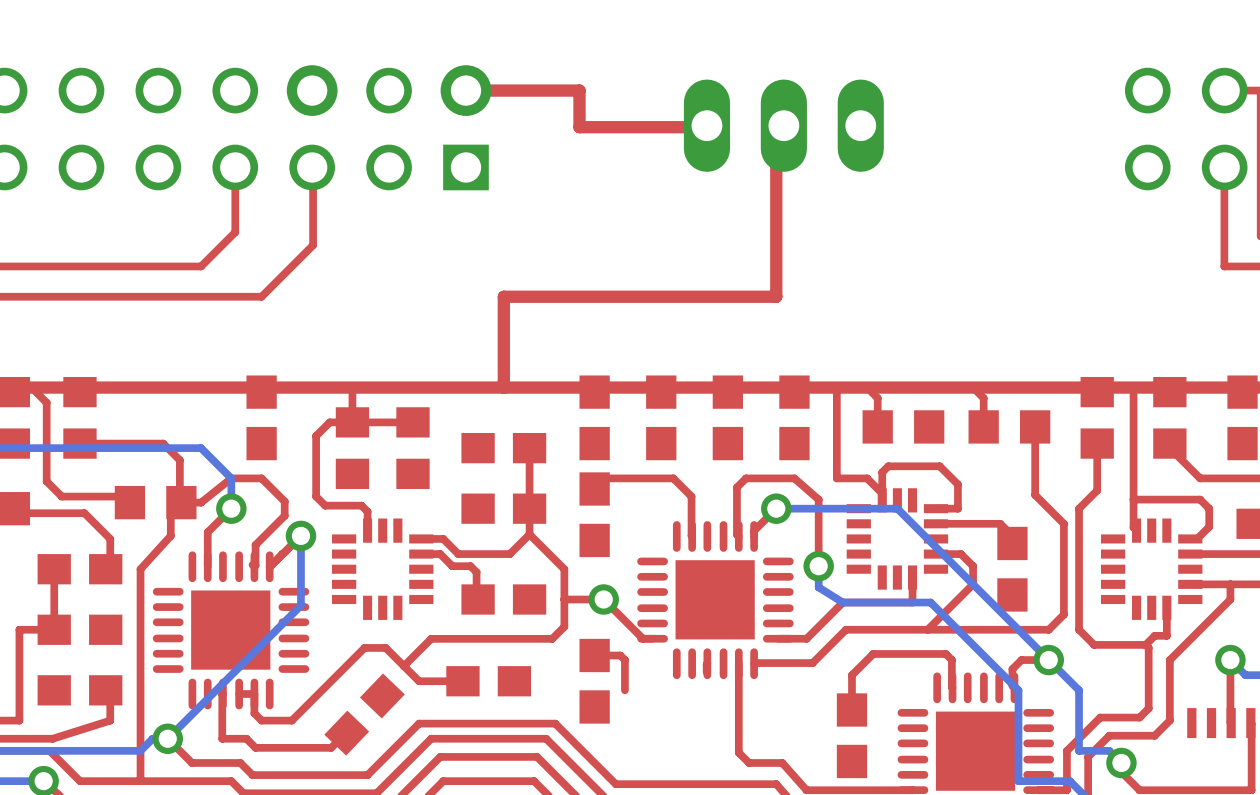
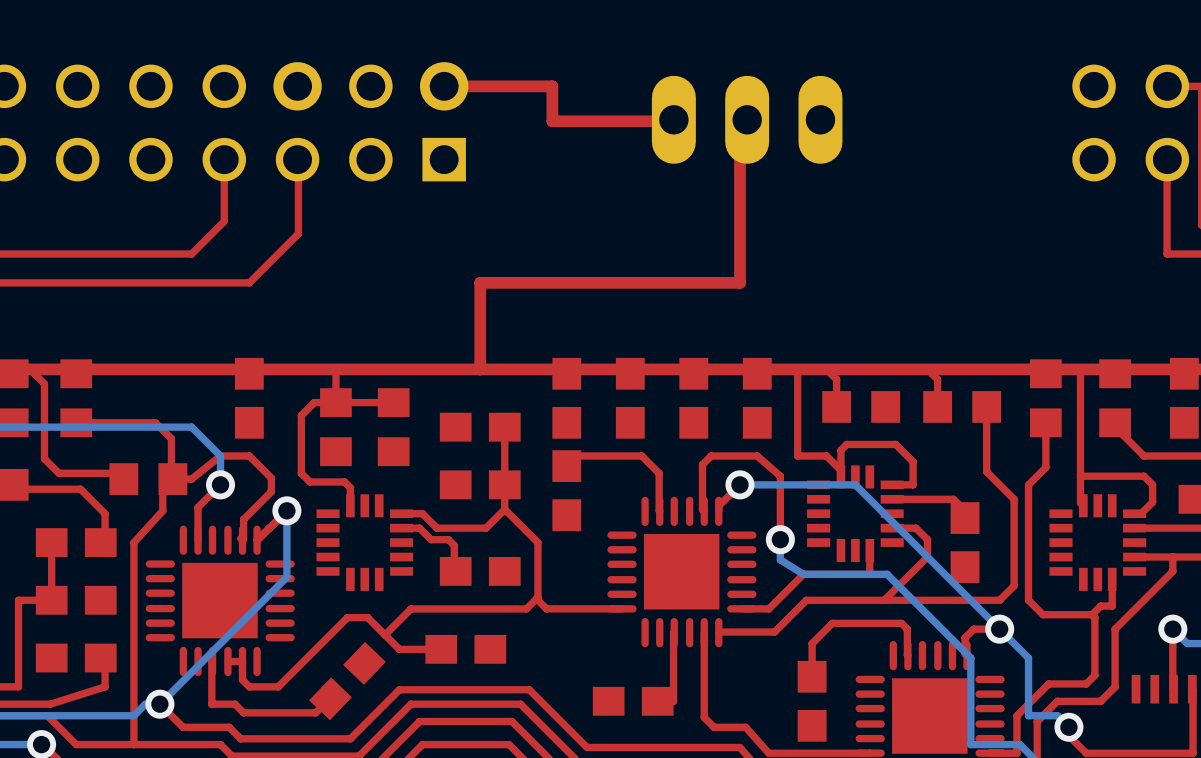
top track: (564, 599) (603, 599) (642, 638) -> (536, 598) (546, 608) (612, 608)
via: (603, 599) -> none
top track: (594, 655) (620, 655) (624, 660) (624, 690) -> none
top track: none -> (673, 640) (673, 701) (657, 701)
part rotation: 0° (594, 681) -> 90° clockwise (633, 701)
part position: (594, 681) -> (633, 701)

